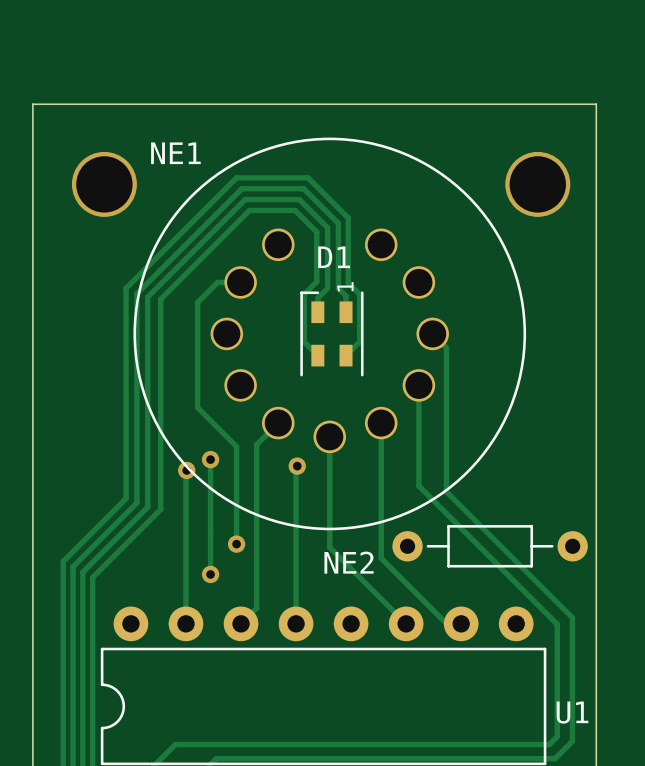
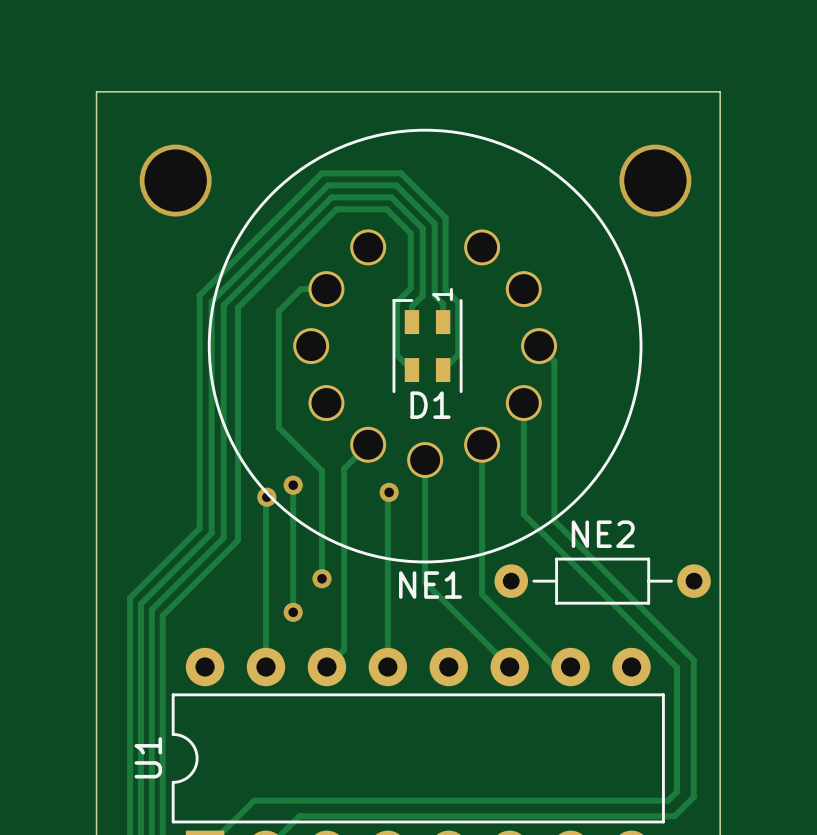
NE1 name position: NE1 (175, 153) -> NE1 (430, 585)
D1 name position: D1 (334, 257) -> D1 (430, 405)
NE2 name position: NE2 (349, 562) -> NE2 (603, 534)
U1 name rotation: 0° (572, 712) -> 90° counterclockwise (148, 757)
U1 name position: U1 (572, 712) -> U1 (148, 757)

